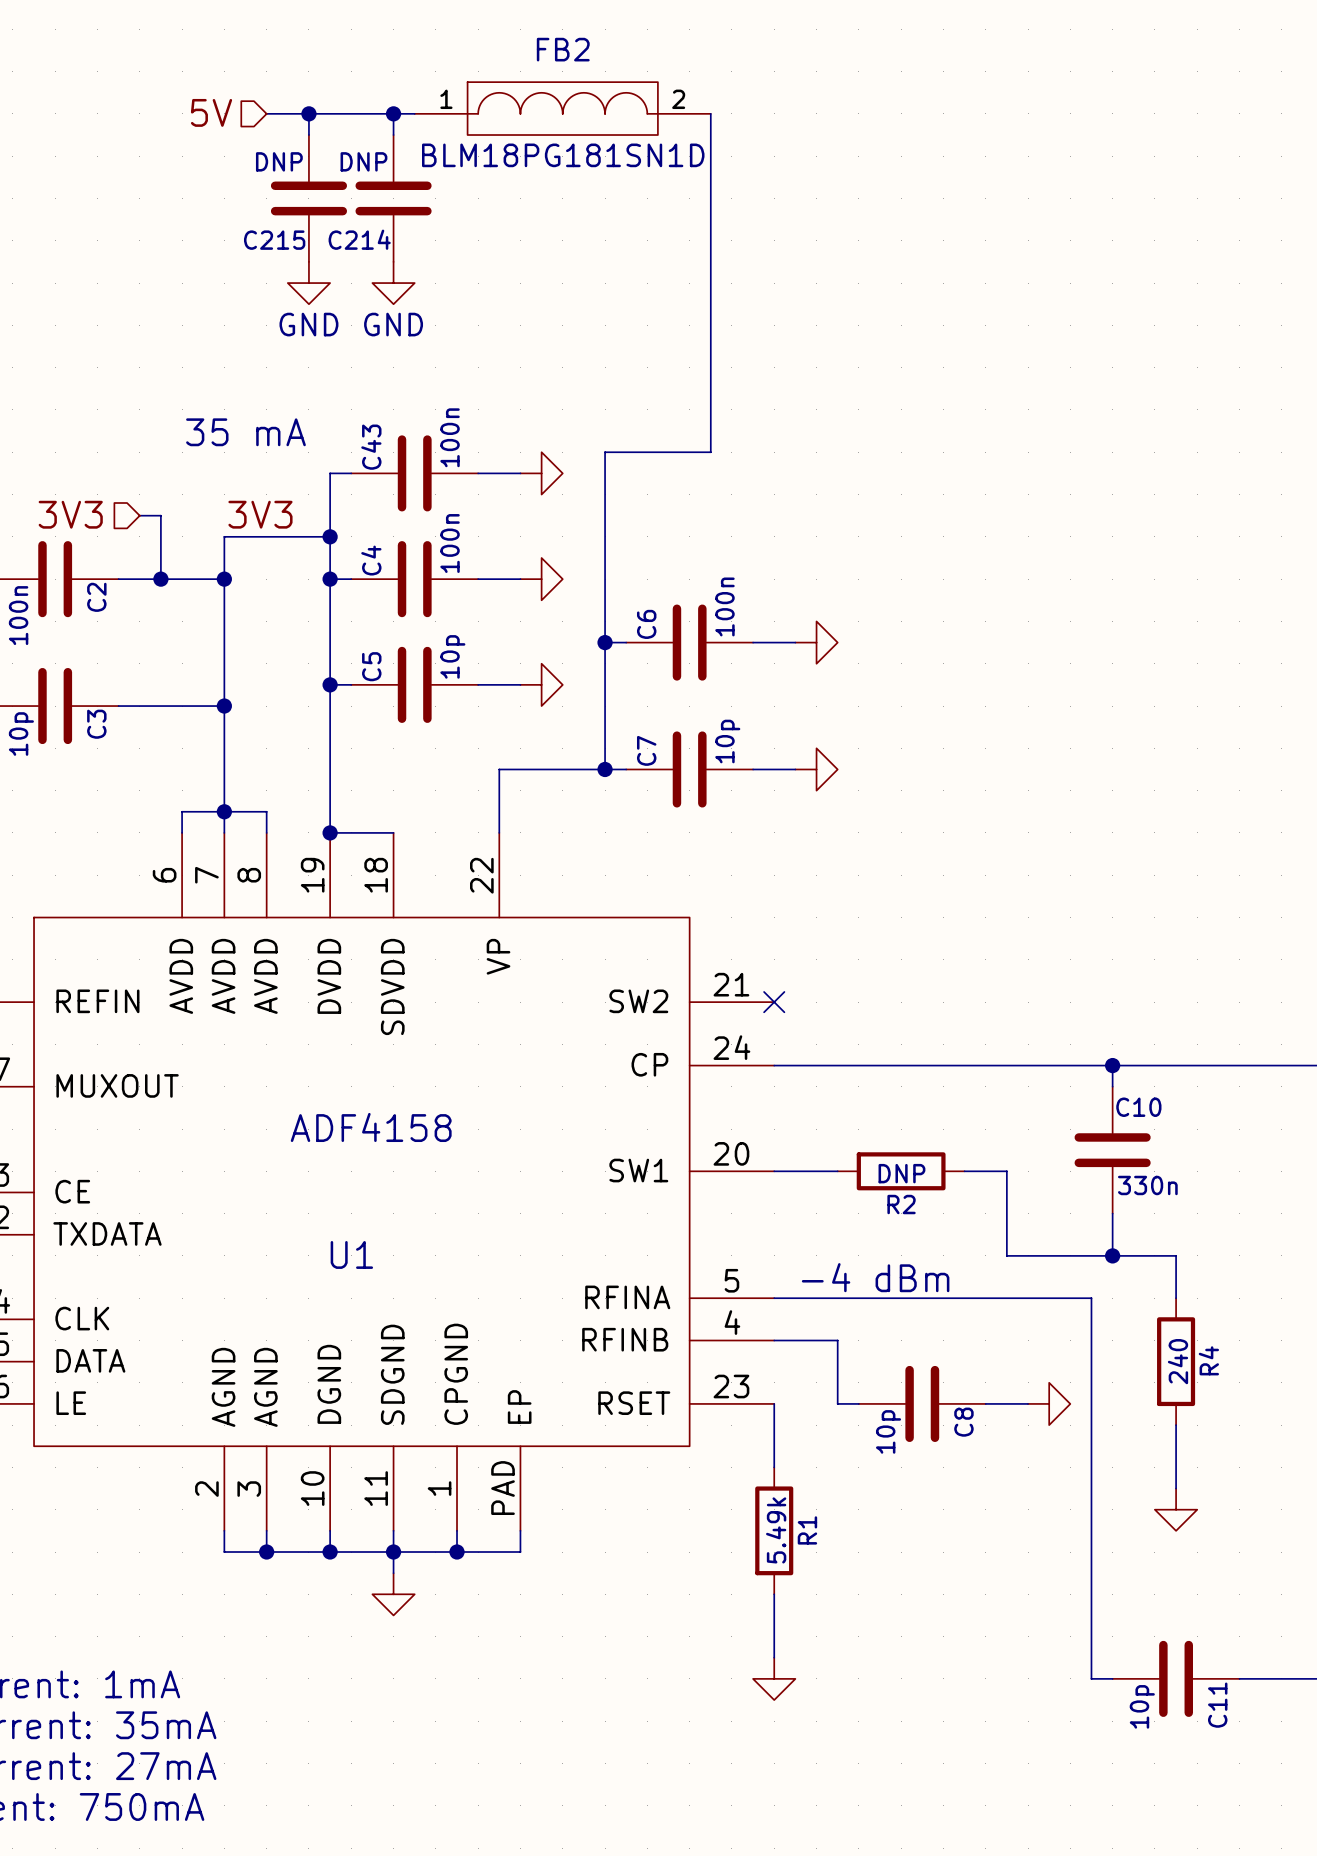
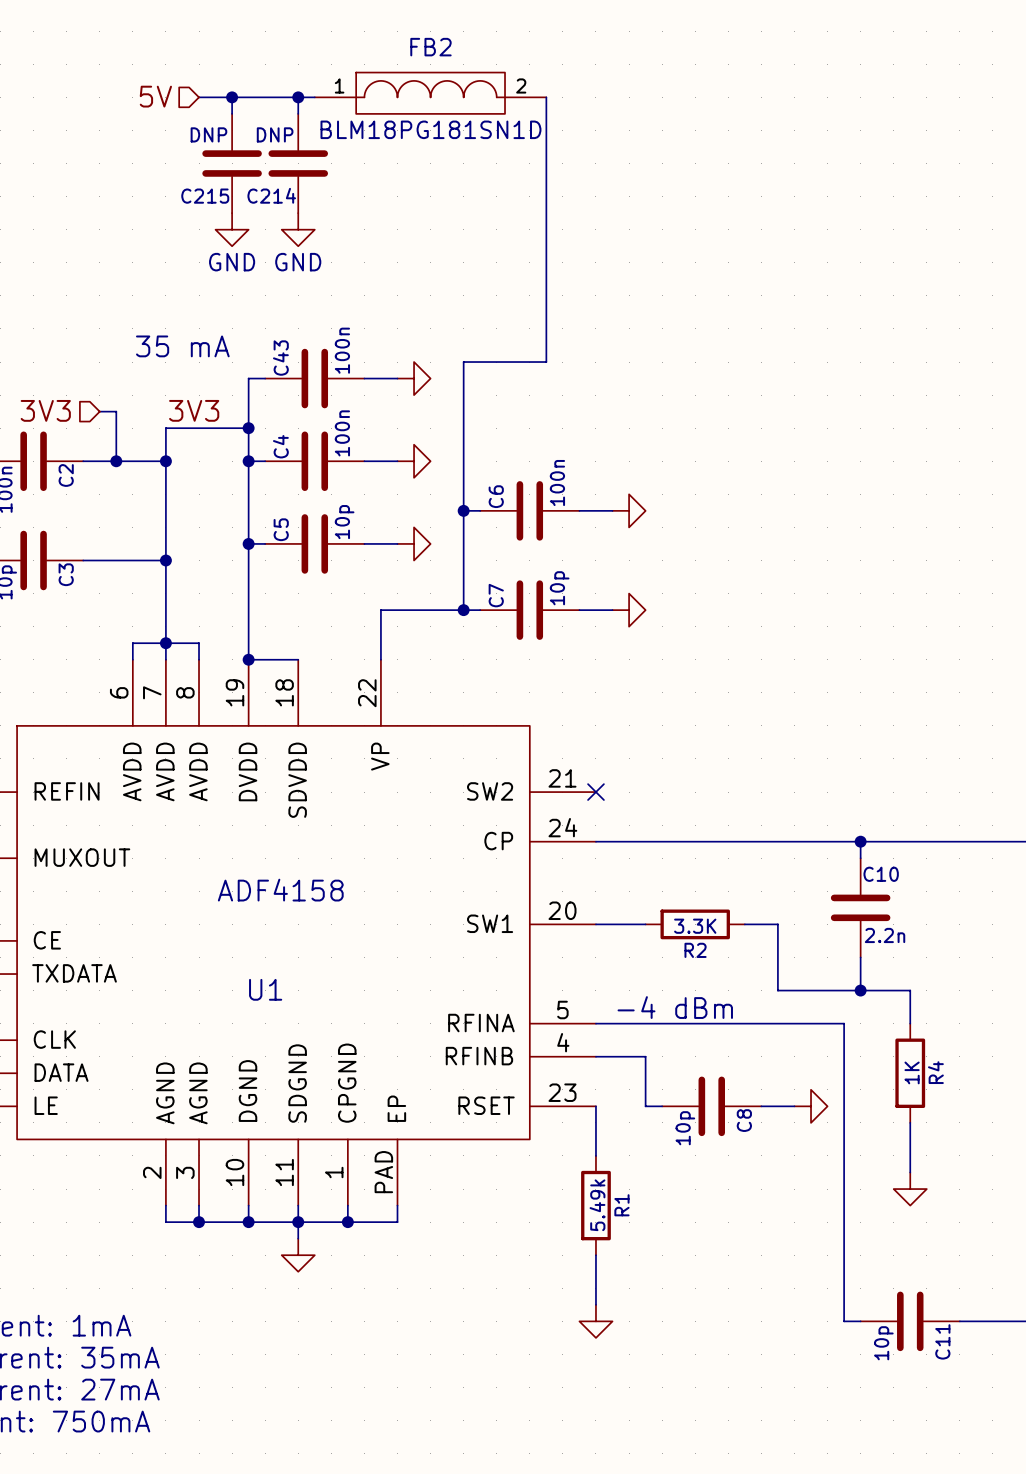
R2 value: DNP (901, 1173) -> 3.3K (695, 926)
C10 value: 330n (1147, 1185) -> 2.2n (885, 935)
R4 value: 240 (1178, 1361) -> 1K (912, 1072)

